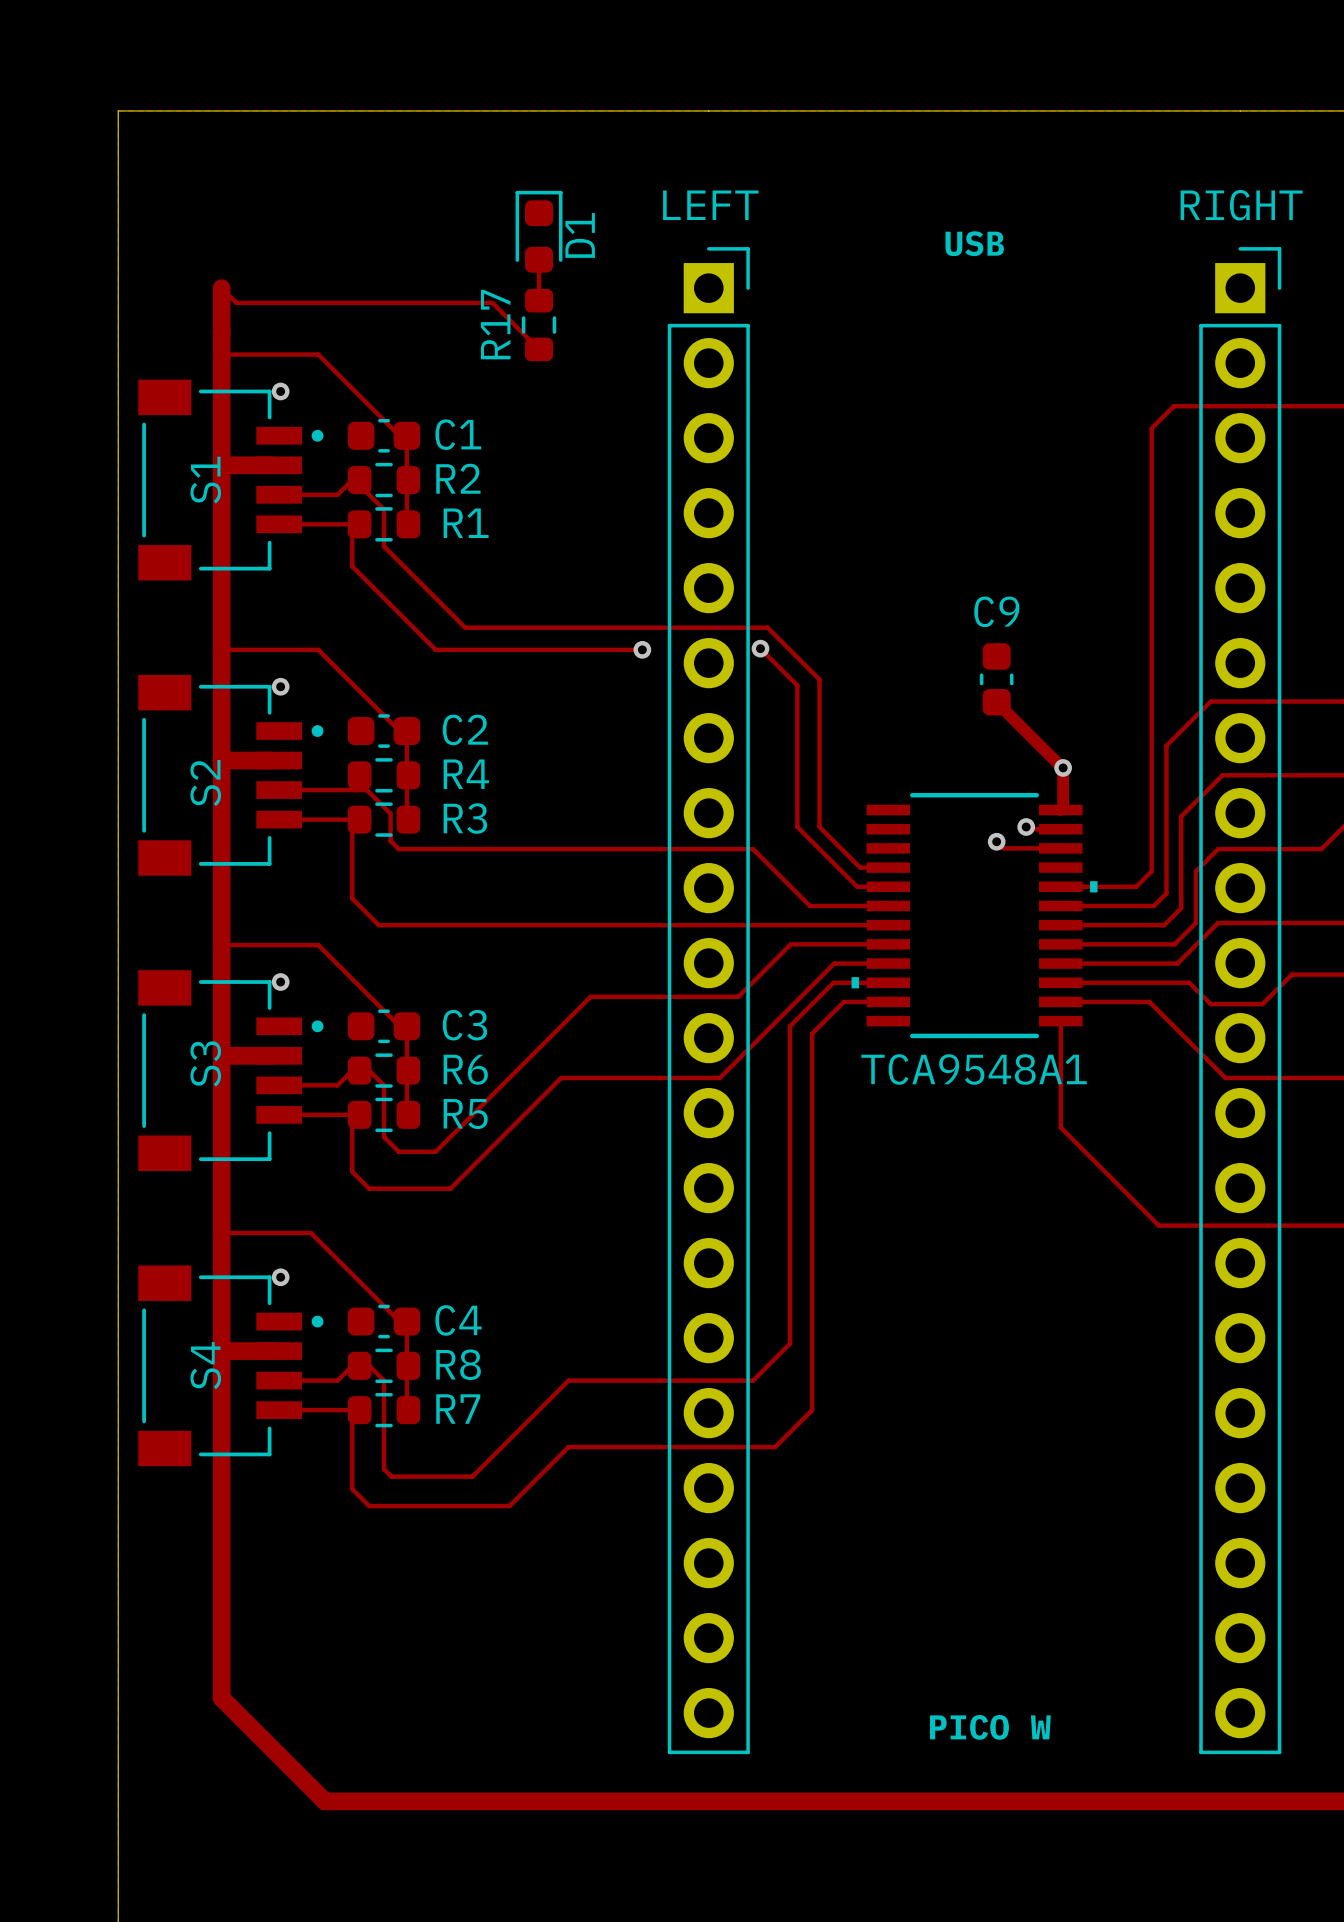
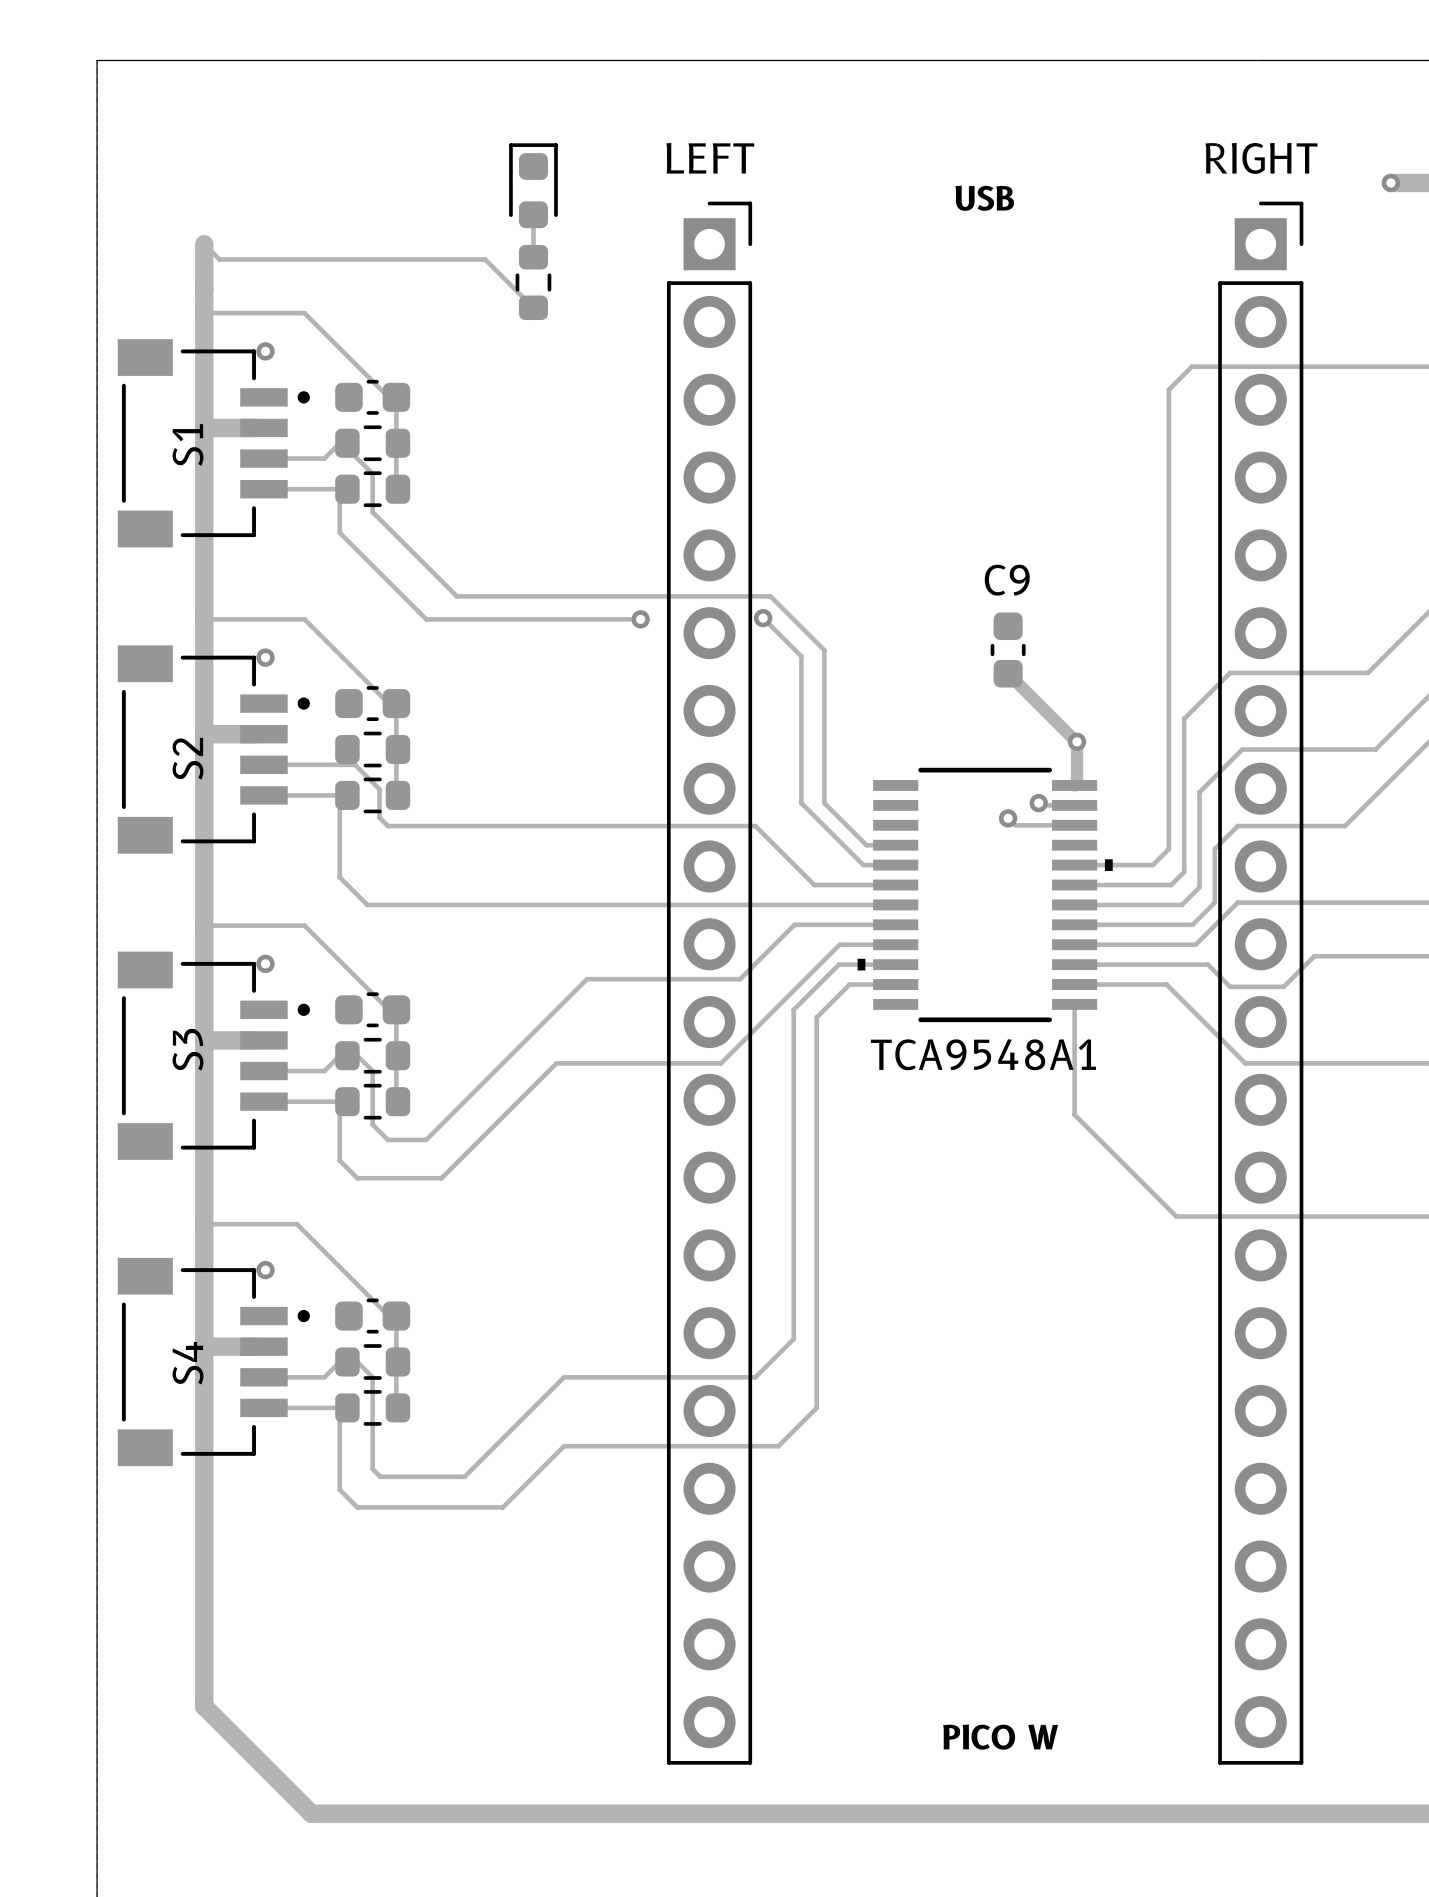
D1 name: D1 (580, 235) -> none
R17 name: R17 (495, 324) -> none
C1 name: C1 (458, 434) -> none
R2 name: R2 (458, 478) -> none
R1 name: R1 (466, 523) -> none
C2 name: C2 (465, 729) -> none
R4 name: R4 (466, 774) -> none
R3 name: R3 (465, 818) -> none
C3 name: C3 (464, 1025) -> none
R6 name: R6 (465, 1069) -> none
R5 name: R5 (465, 1114) -> none
C4 name: C4 (458, 1320) -> none
R8 name: R8 (458, 1364) -> none
R7 name: R7 (458, 1409) -> none

